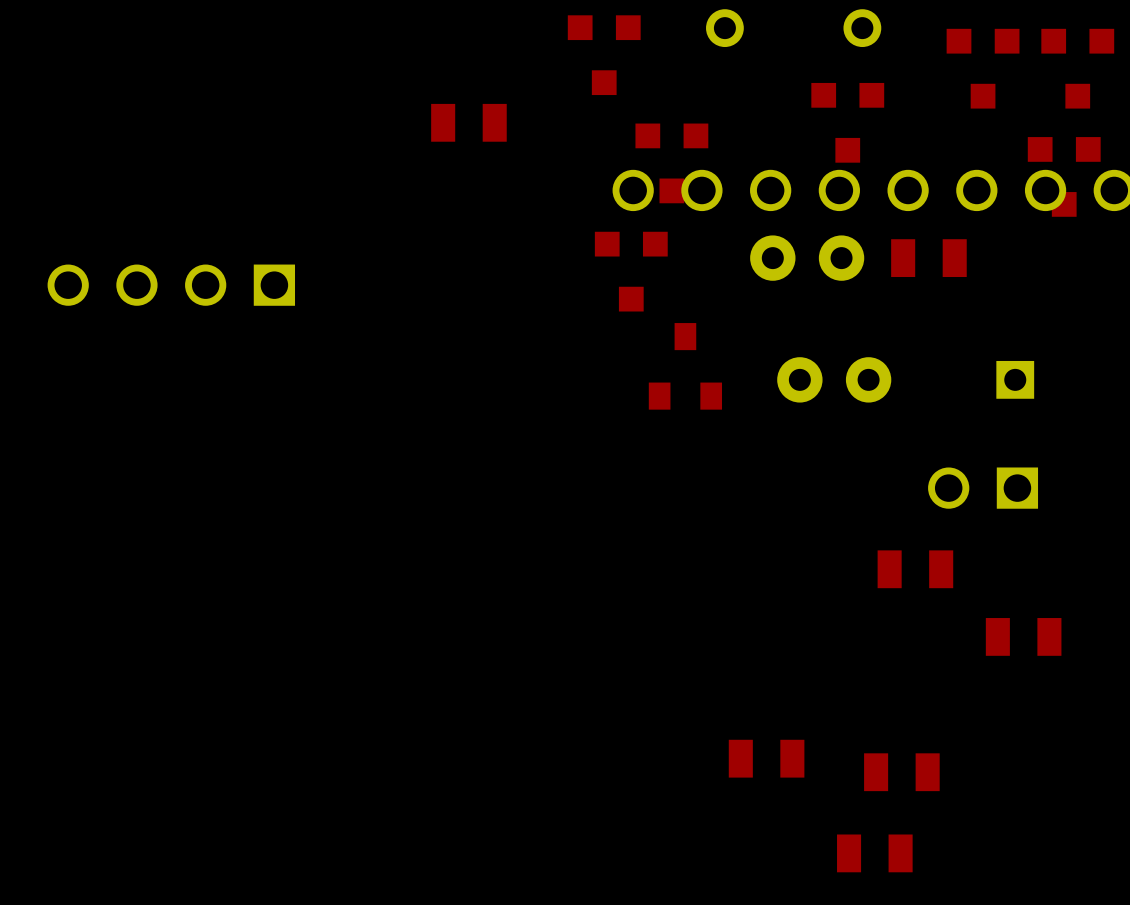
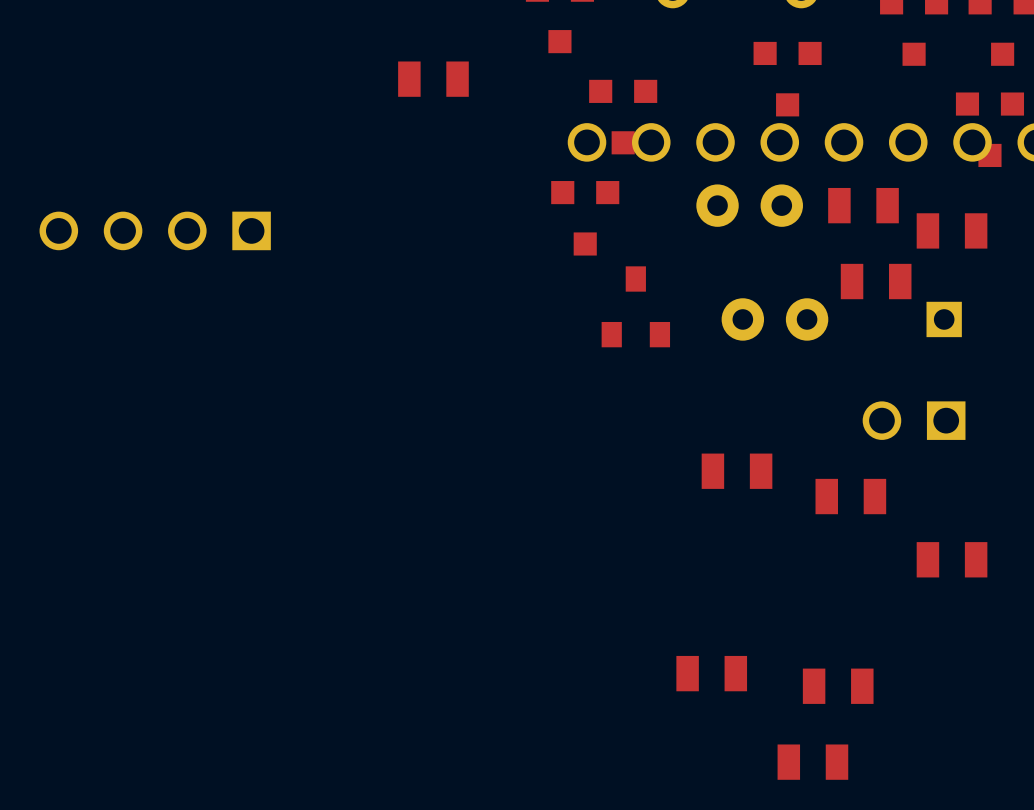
part: none -> (952, 230)
part: none -> (876, 281)
part: none -> (737, 471)

